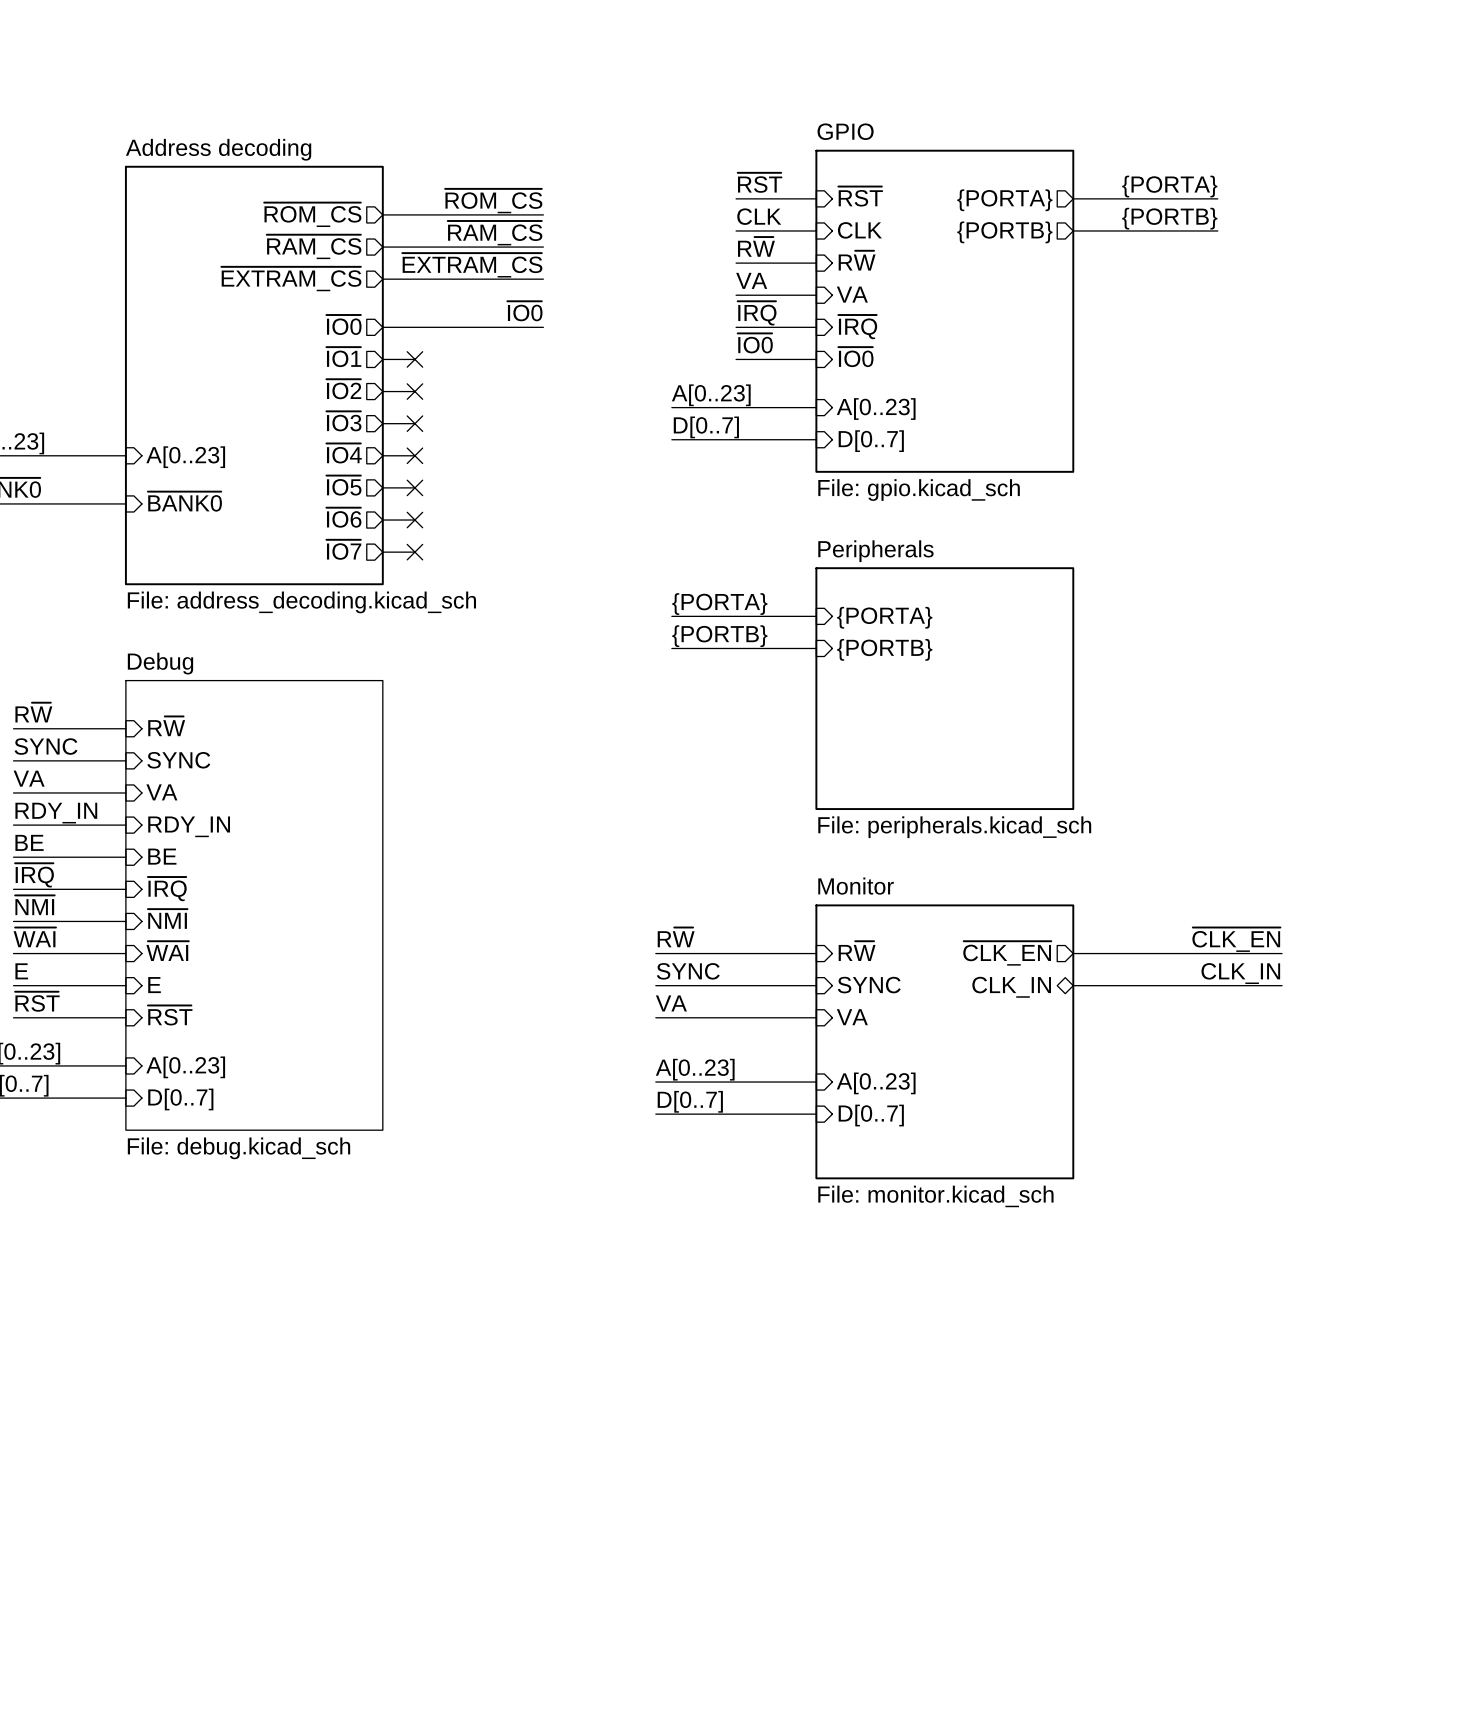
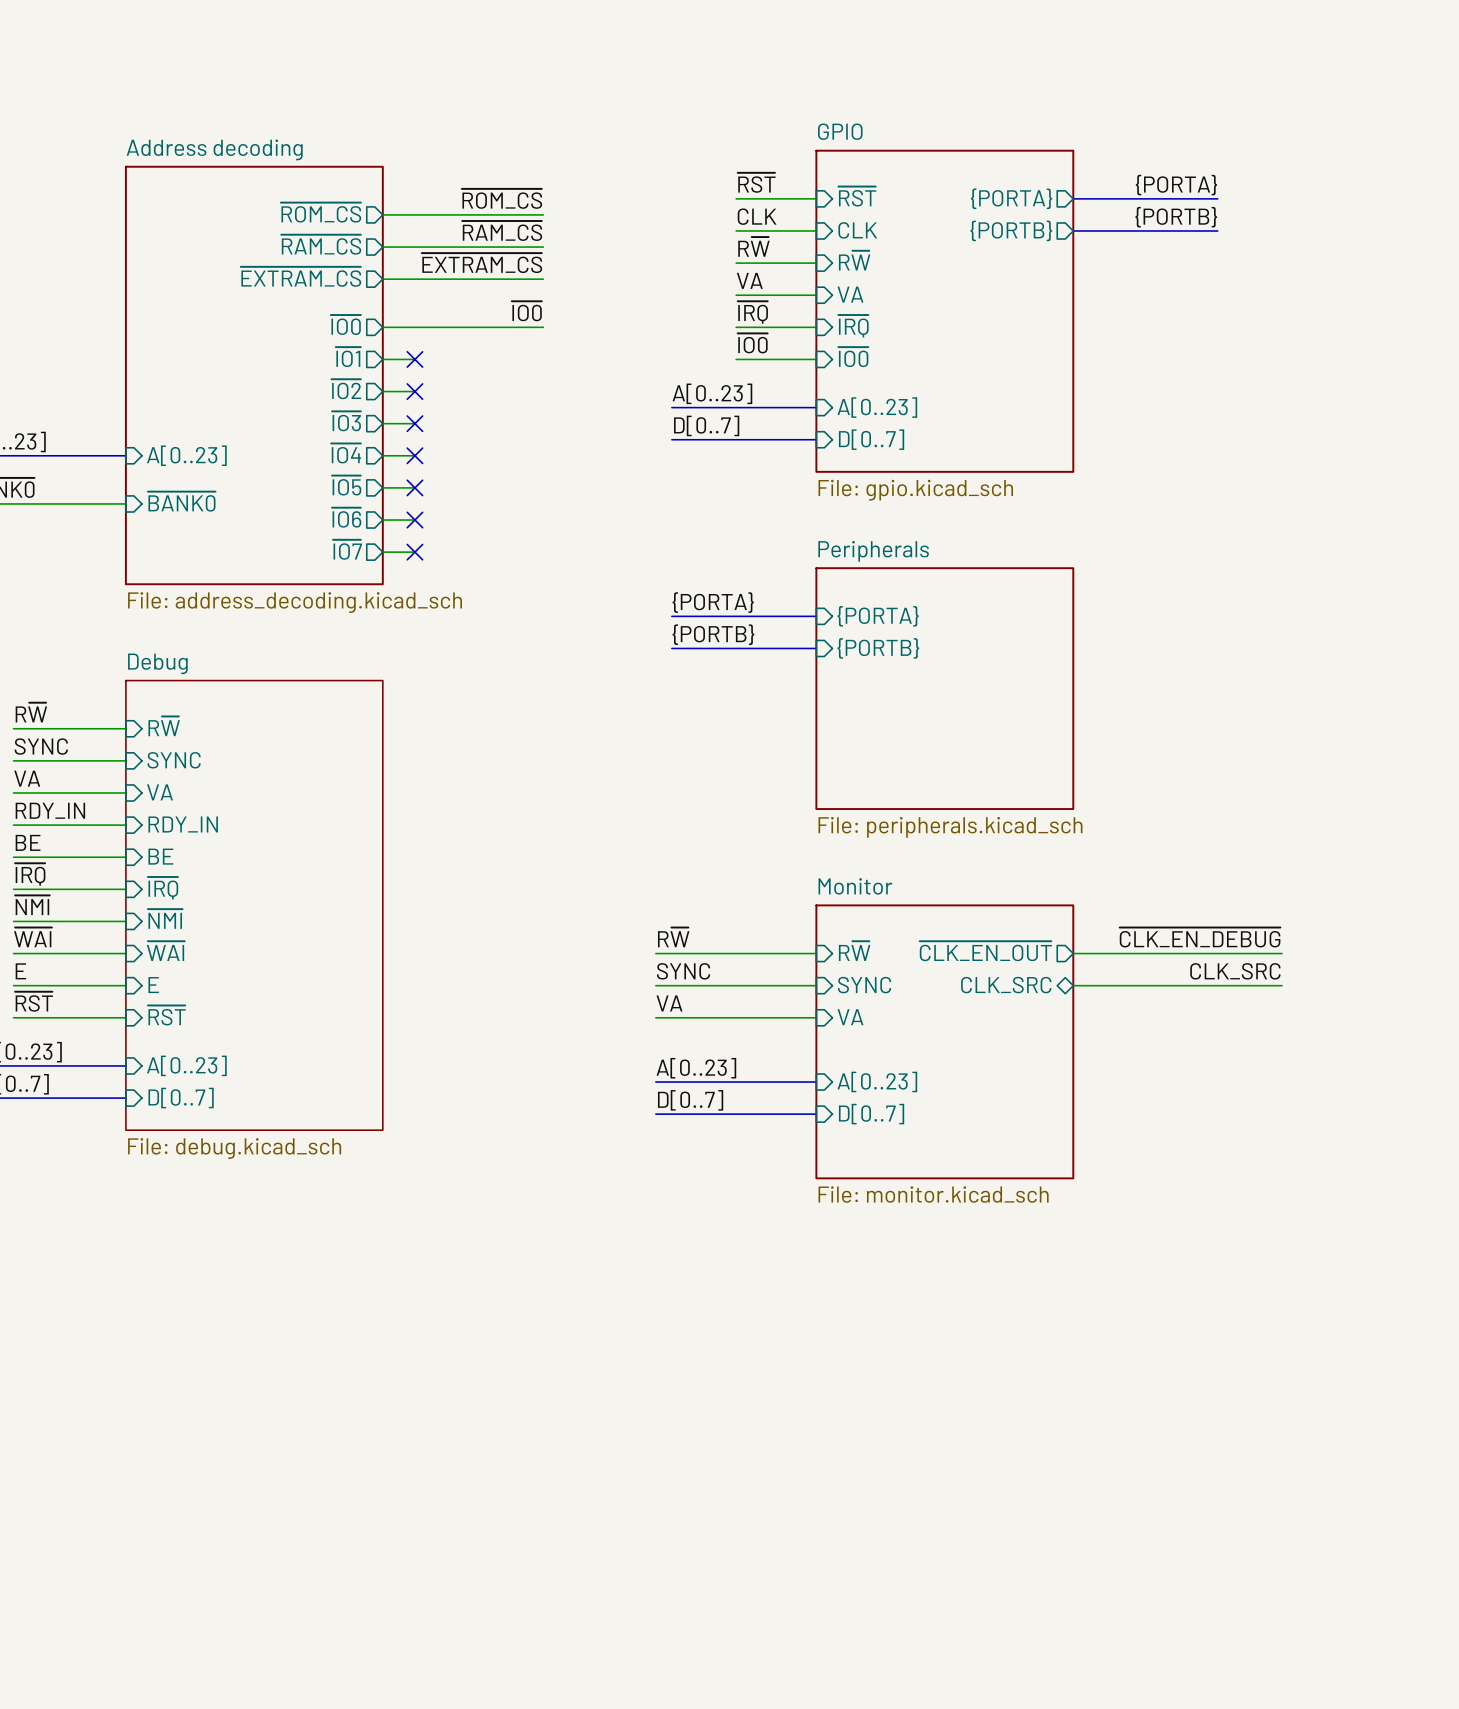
label: ~{CLK_EN} (1236, 939) -> ~{CLK_EN_DEBUG} (1200, 937)
sheet pin: ~{CLK_EN} (1007, 953) -> ~{CLK_EN_OUT} (985, 951)
label: CLK_IN (1240, 973) -> CLK_SRC (1235, 971)
sheet pin: CLK_IN (1011, 987) -> CLK_SRC (1006, 985)

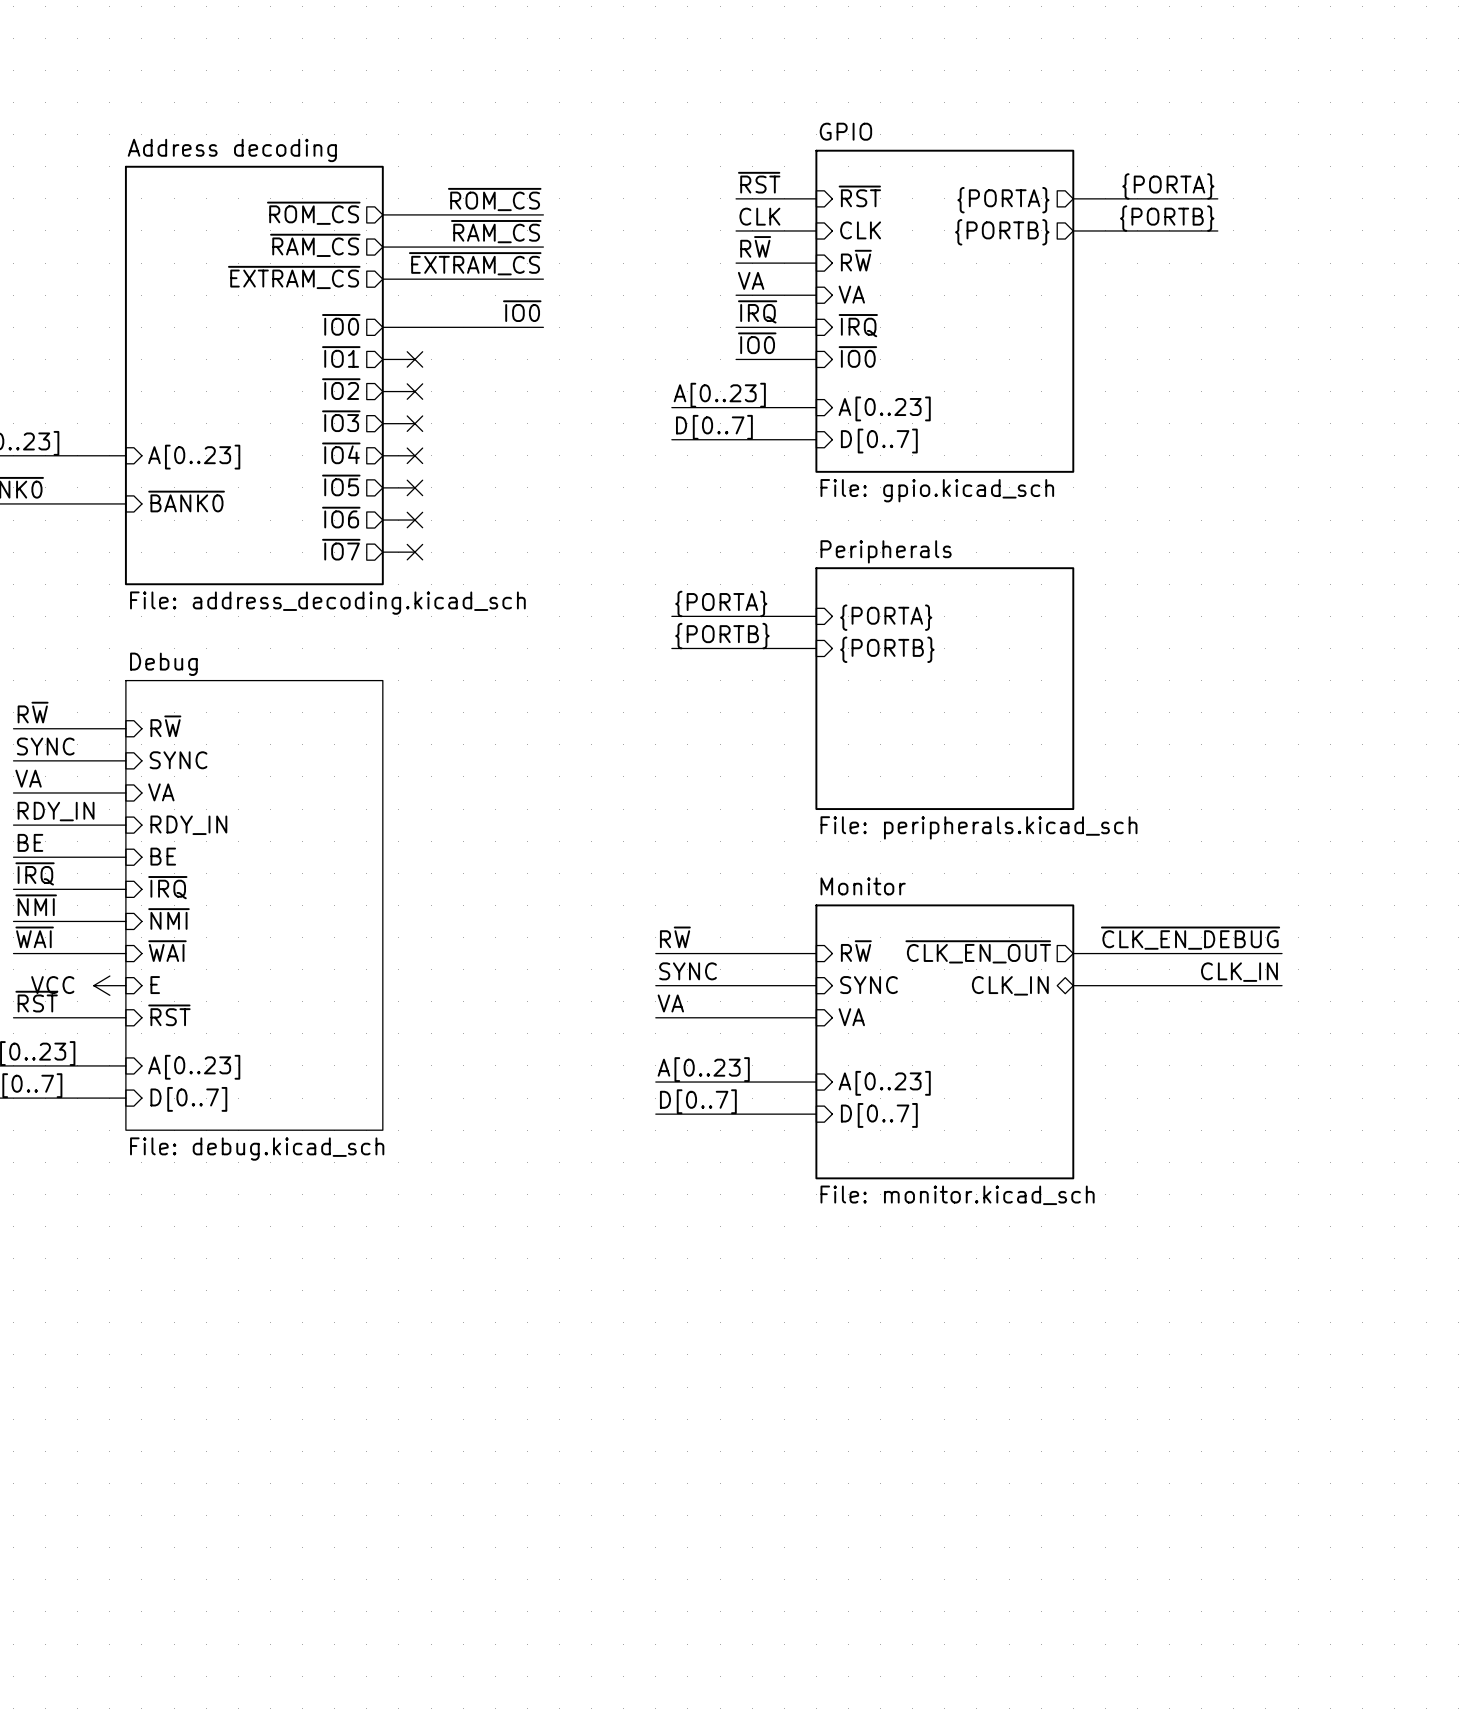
label: E (20, 971) -> none
label: CLK_SRC (1235, 971) -> CLK_IN (1239, 972)
wire: (13, 985) (125, 985) -> none
power symbol: none -> VCC (109, 985)
sheet pin: CLK_SRC (1006, 985) -> CLK_IN (1010, 985)

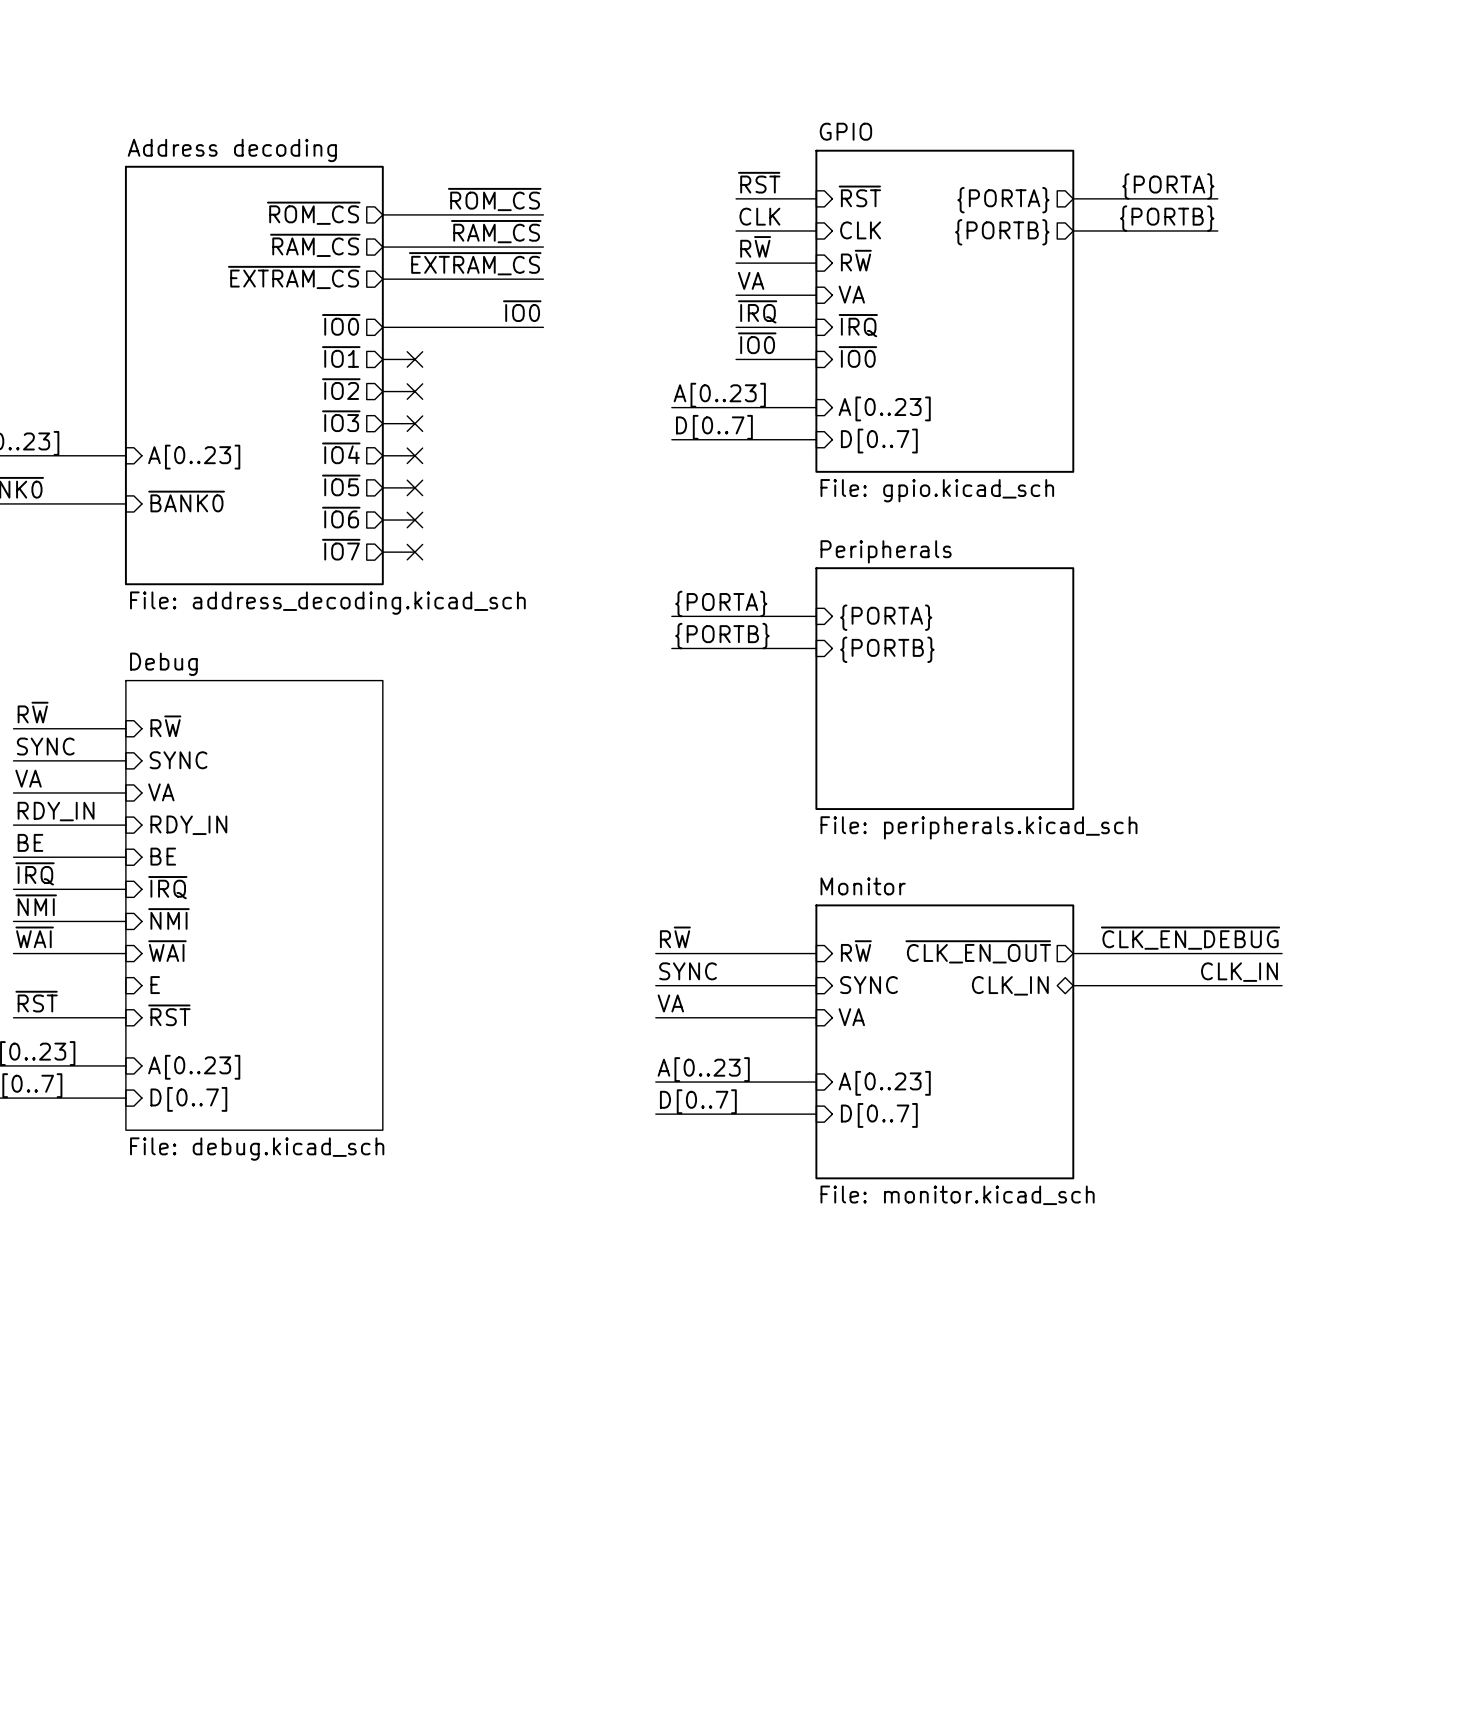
power symbol: VCC (109, 985) -> none

